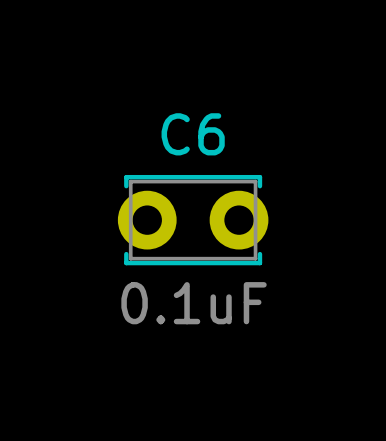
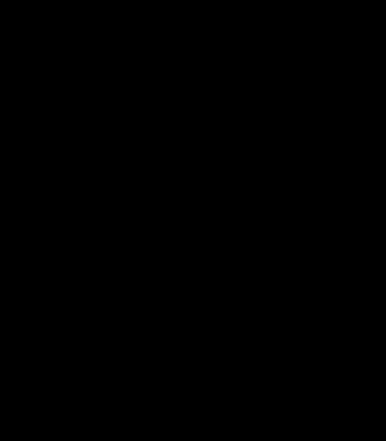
C6: 0.1uF (193, 220) -> none

